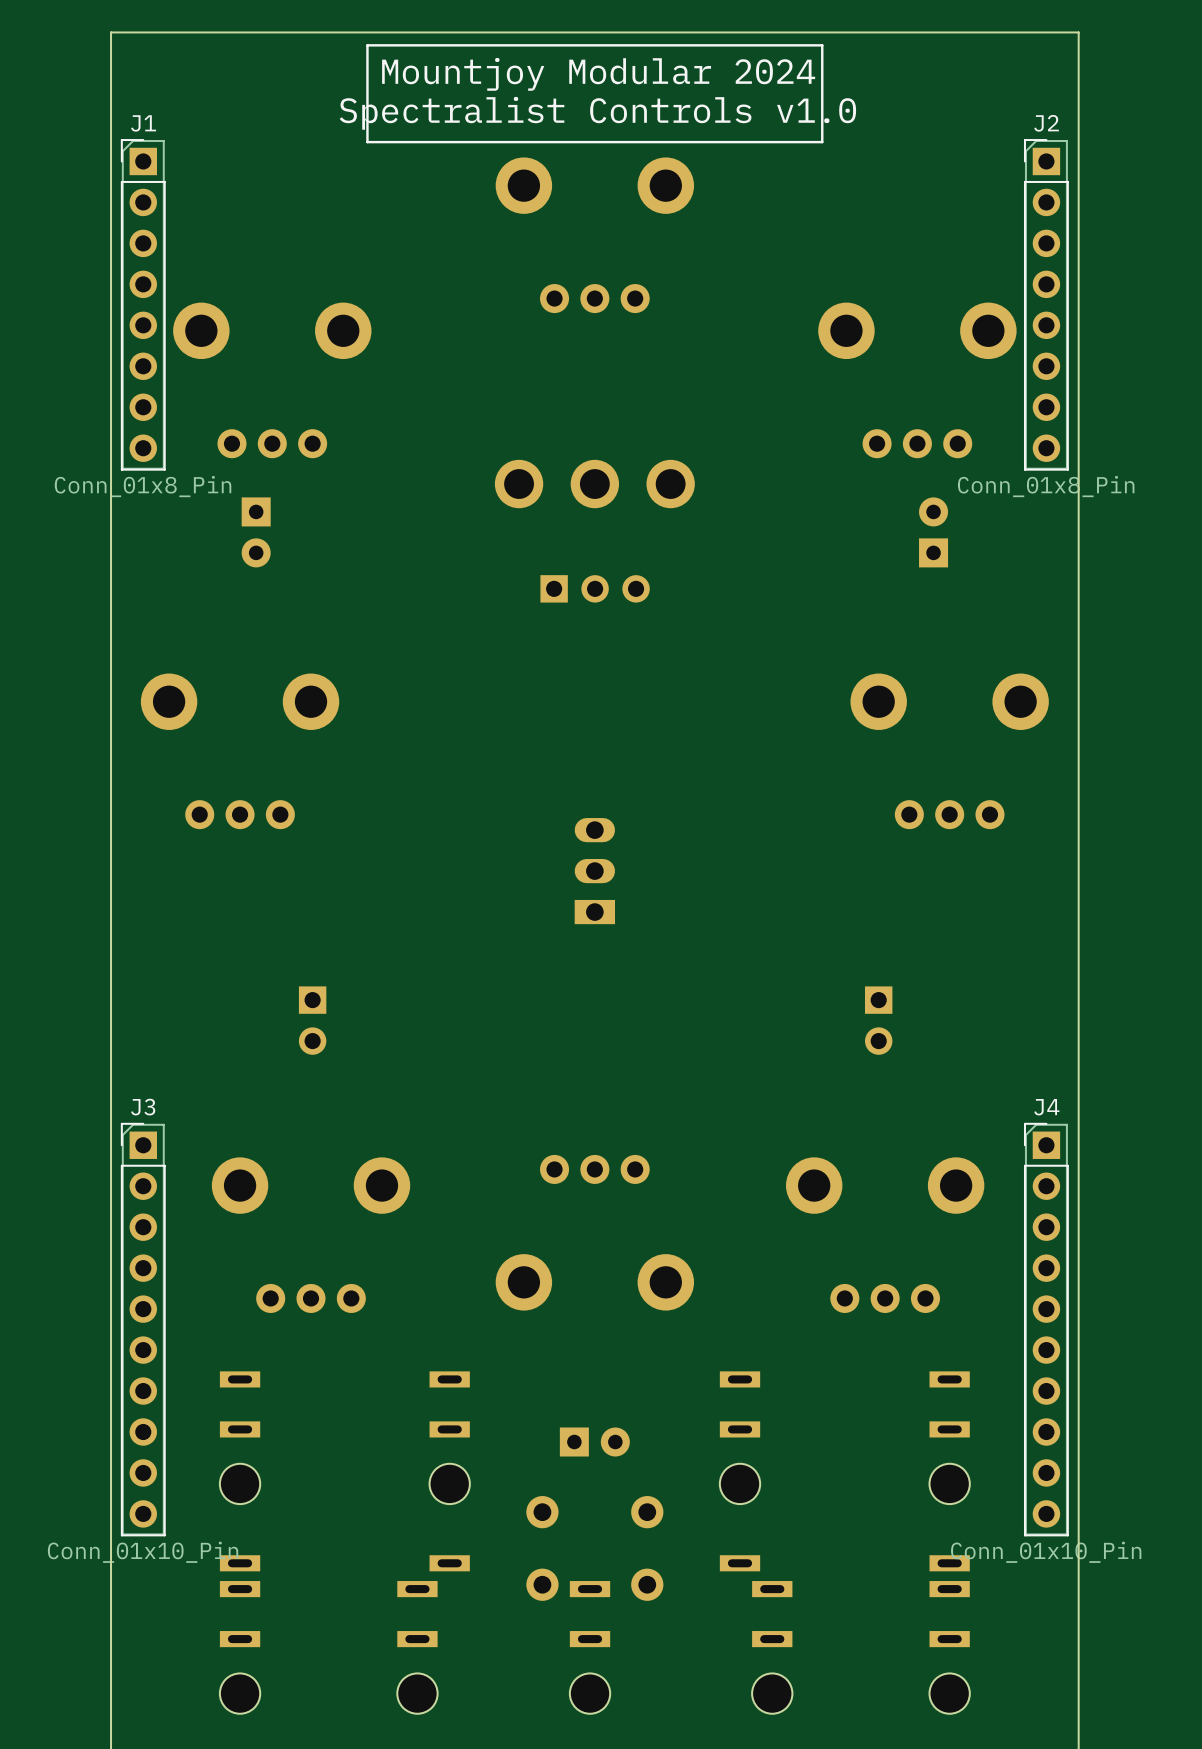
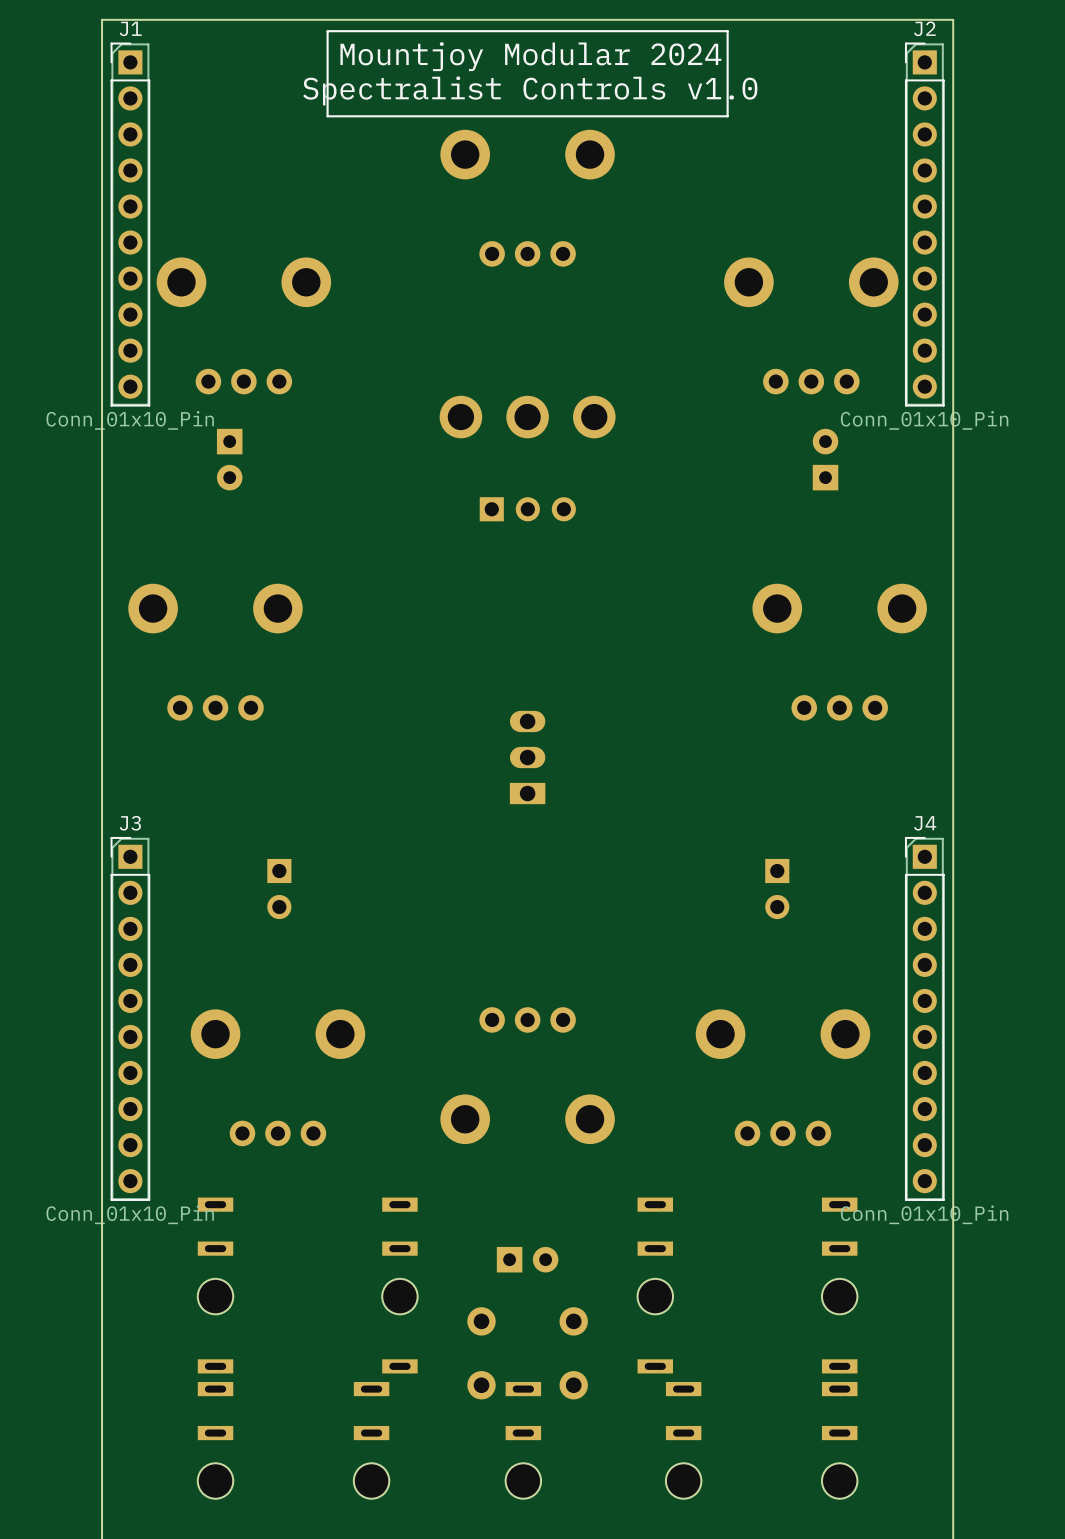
J1 name position: J1 (143, 123) -> J1 (130, 28)
J2 name position: J2 (1046, 123) -> J2 (924, 28)
J1 footprint: [120, 139, 166, 471] -> [110, 42, 151, 407]
J2 footprint: [1024, 139, 1069, 471] -> [905, 42, 945, 407]
J1 value: Conn_01x8_Pin (143, 486) -> Conn_01x10_Pin (130, 420)
J2 value: Conn_01x8_Pin (1046, 486) -> Conn_01x10_Pin (924, 420)
J3 position: (143, 1329) -> (130, 1018)
J4 position: (1046, 1329) -> (924, 1018)

